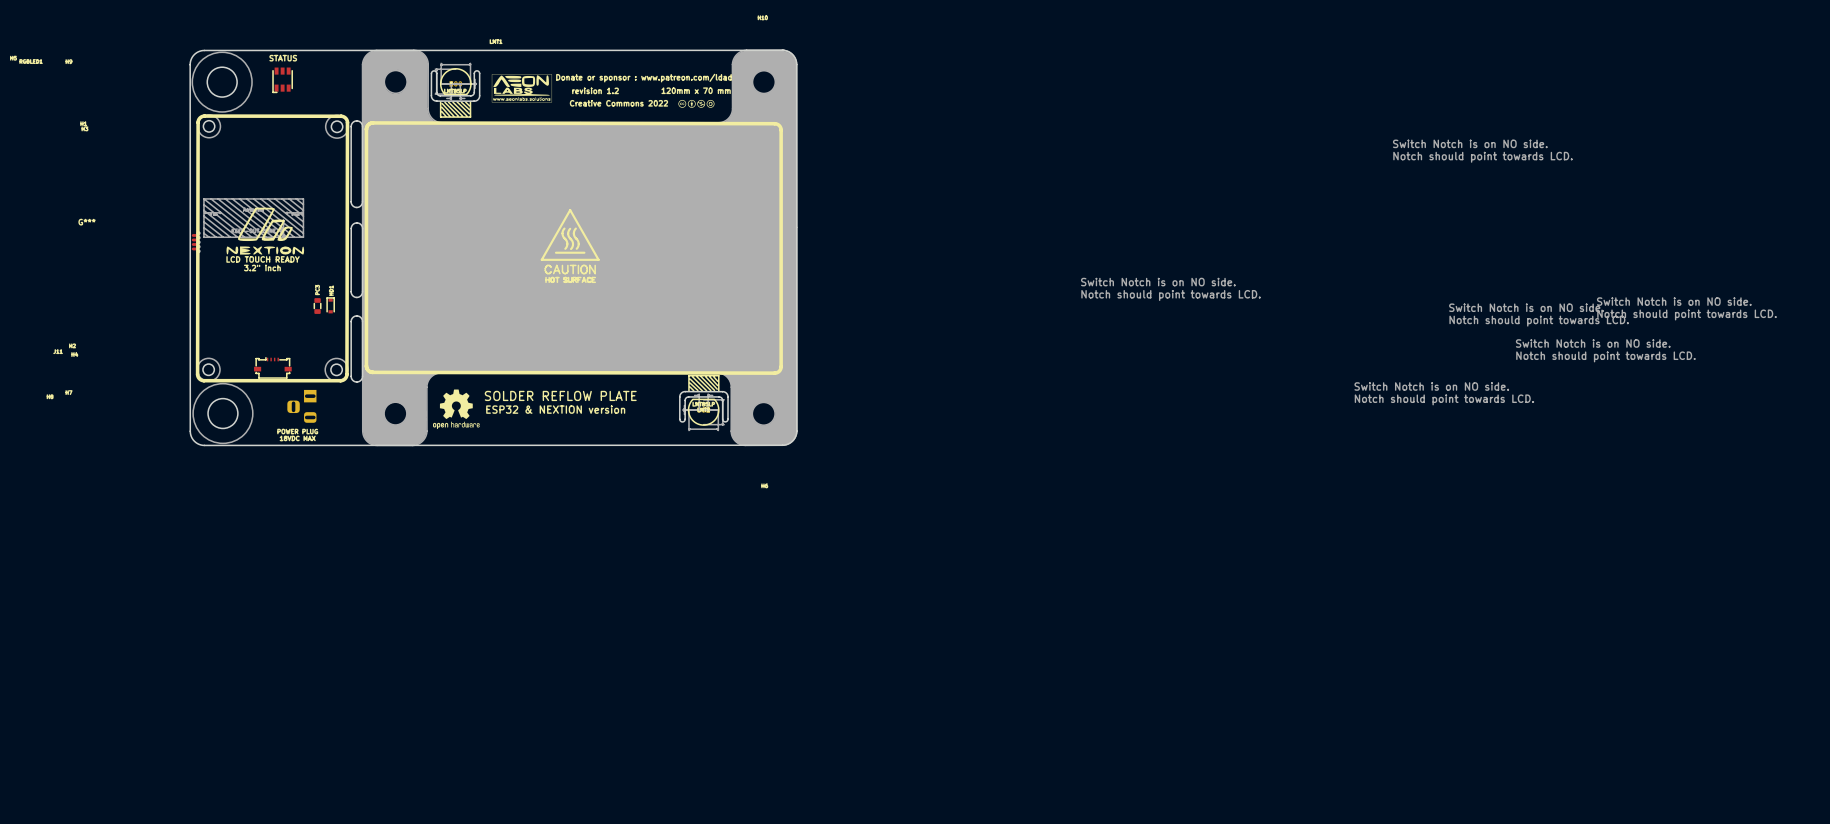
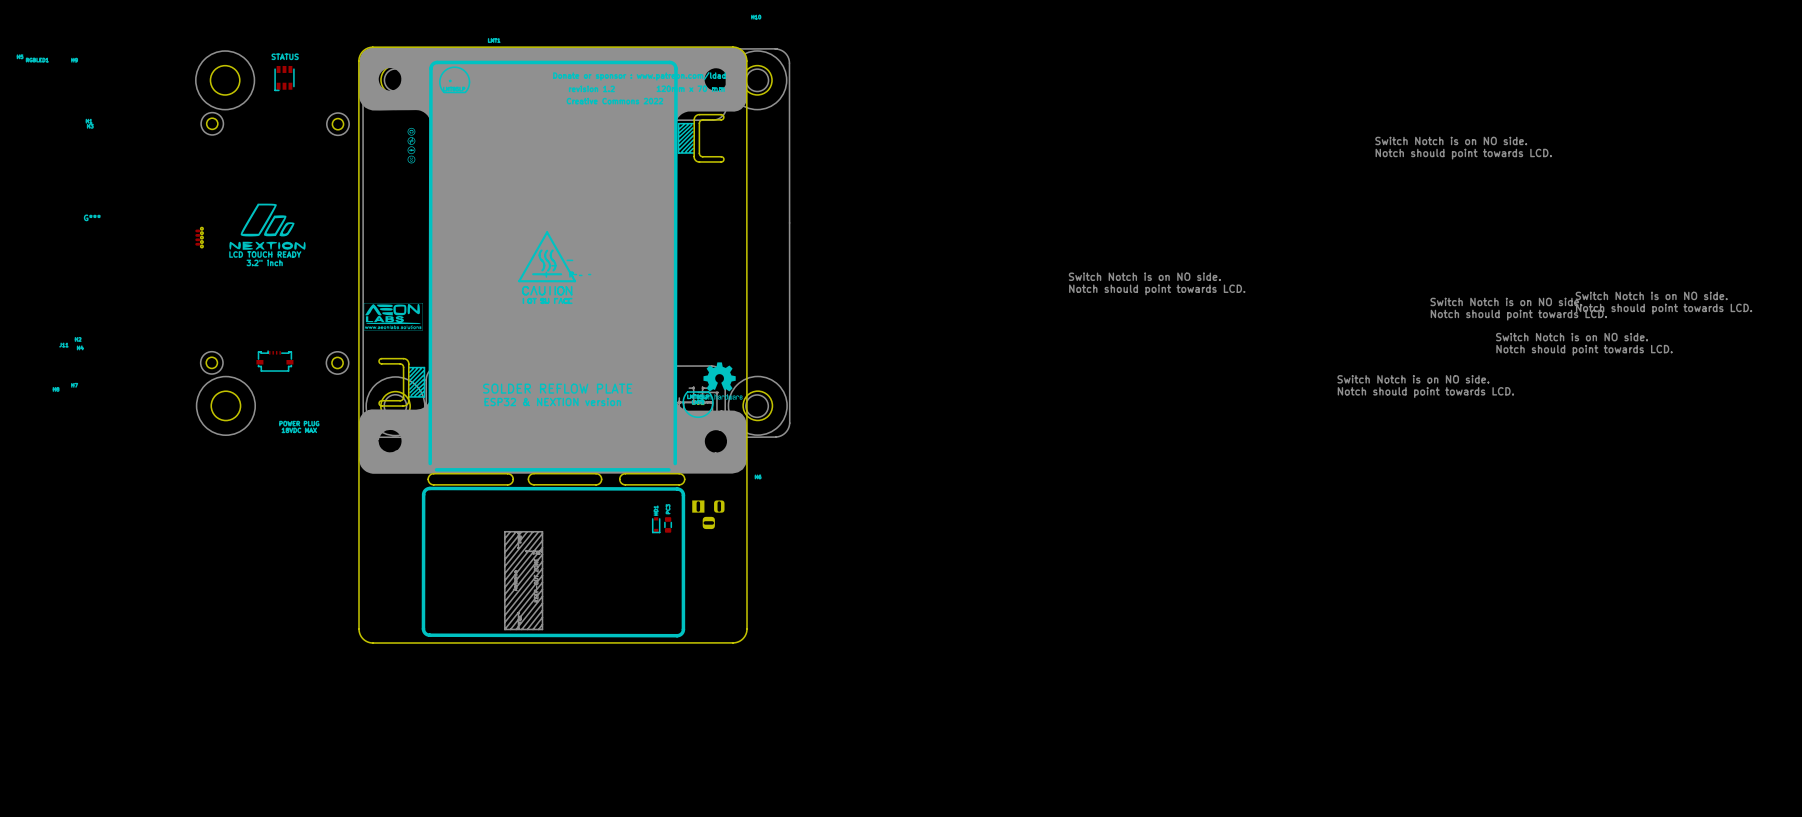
drawing: none -> [358, 47, 747, 474]
board edge: none -> (732, 47) (372, 47) (365, 49) (360, 54) (358, 61) (359, 629) (360, 635) (365, 640) (373, 643) (733, 642) (740, 641) (745, 635) (747, 628) (746, 61) (742, 51) (732, 47)
drawing: [362, 50, 797, 446] -> none
board edge: (782, 50) (204, 50) (196, 52) (191, 58) (190, 64) (190, 431) (192, 438) (197, 443) (204, 445) (782, 445) (789, 443) (794, 438) (796, 431) (796, 64) (792, 54) (782, 50) -> none
board edge: (479, 73) (479, 96) (477, 100) (436, 101) (432, 98) (432, 71) (436, 72) (436, 92) (440, 95) (472, 95) (474, 72) (477, 70) (479, 73) -> none
line: (457, 101) (469, 113) -> none
line: (470, 101) (470, 117) (440, 117) (440, 101) -> none
line: (444, 102) (458, 116) -> none
line: (448, 102) (462, 116) -> none
line: (452, 102) (467, 116) -> none
line: (461, 102) (469, 109) -> none
line: (465, 102) (469, 105) -> none
line: (442, 103) (453, 116) -> none
line: (441, 107) (449, 116) -> none
line: (441, 111) (445, 116) -> none
line: (204, 116) (341, 116) (345, 118) (347, 122) -> none
line: (204, 116) (199, 117) (198, 122) (197, 374) -> none
board edge: none -> (699, 114) (723, 116) (721, 119) (702, 119) (699, 123) (699, 155) (722, 156) (723, 159) (722, 161) (698, 161) (694, 158) (694, 119) (699, 114)
board edge: (356, 120) (351, 125) (351, 201) (352, 205) (356, 207) (362, 202) (362, 126) (360, 122) (356, 120) -> none
line: (347, 122) (346, 377) (340, 380) (203, 380) (199, 378) (197, 374) -> none
line: (372, 122) (774, 123) (779, 125) (781, 130) (781, 366) (777, 372) (372, 372) -> none
line: none -> (693, 123) (678, 123) (678, 153) (693, 152)
line: none -> (683, 124) (679, 128)
line: none -> (688, 124) (679, 132)
line: none -> (691, 125) (679, 136)
line: (366, 129) (366, 365) -> none
line: none -> (692, 127) (679, 141)
line: none -> (693, 131) (679, 145)
line: none -> (693, 135) (679, 149)
line: none -> (693, 139) (681, 151)
line: none -> (692, 144) (685, 151)
line: none -> (693, 148) (689, 152)
line: (570, 210) (598, 259) (541, 259) (570, 210) -> (547, 232) (575, 281) (519, 281) (547, 232)
part: (253, 218) -> none
board edge: (356, 222) (351, 227) (351, 291) (352, 295) (356, 297) (362, 292) (362, 228) (360, 224) (356, 222) -> none
line: (564, 228) (562, 233) (567, 242) (565, 248) -> (541, 250) (539, 255) (544, 264) (542, 270)
line: (570, 228) (568, 233) (572, 242) (571, 249) -> (547, 250) (545, 255) (549, 264) (547, 270)
line: (575, 228) (574, 234) (578, 243) (576, 248) -> (552, 250) (550, 256) (555, 265) (553, 270)
line: (555, 252) (584, 252) -> (533, 274) (561, 274)
line: (562, 265) (562, 271) (564, 273) (567, 272) (567, 265) -> (539, 286) (539, 292) (541, 294) (544, 293) (544, 286)
line: (573, 265) (573, 273) -> (550, 286) (550, 294)
line: (578, 265) (578, 273) -> (555, 286) (555, 294)
line: (583, 265) (580, 270) (584, 273) (587, 268) (583, 265) -> (560, 286) (557, 291) (561, 294) (563, 289) (560, 286)
line: (595, 265) (595, 273) (589, 265) (589, 273) -> (571, 286) (571, 294) (566, 286) (566, 294)
line: (551, 267) (547, 265) (545, 268) (546, 273) (551, 271) -> (528, 288) (524, 286) (522, 289) (524, 294) (528, 292)
line: (553, 273) (556, 265) (559, 273) -> (530, 294) (533, 286) (537, 294)
line: (546, 277) (546, 282) -> (523, 298) (523, 303)
line: (552, 277) (554, 279) (552, 282) (550, 280) (552, 277) -> (529, 298) (531, 300) (530, 303) (527, 301) (529, 298)
line: (555, 277) (558, 277) -> (532, 298) (536, 298)
line: (557, 277) (557, 282) -> (534, 298) (534, 303)
line: (568, 277) (569, 282) (571, 277) -> (545, 298) (546, 303) (548, 298)
line: (580, 277) (577, 277) (577, 282) -> (557, 298) (554, 298) (554, 303)
line: (595, 277) (592, 277) (592, 282) (595, 282) -> (571, 298) (568, 298) (568, 303) (571, 303)
line: (567, 278) (563, 278) (567, 280) (563, 281) -> (544, 299) (540, 299) (544, 301) (540, 302)
line: (590, 278) (588, 277) (587, 279) (588, 282) (590, 281) -> (567, 299) (564, 300) (564, 303) (567, 302)
line: (582, 282) (584, 277) (585, 282) -> (559, 303) (560, 298) (562, 303)
part rotation: 0° (330, 305) -> 180° (656, 525)
part position: (330, 305) -> (656, 525)
part position: (317, 306) -> (668, 524)
board edge: (356, 315) (352, 317) (351, 321) (351, 376) (356, 382) (360, 380) (362, 376) (362, 320) (356, 315) -> none
board edge: none -> (381, 358) (404, 358) (408, 361) (408, 401) (406, 405) (379, 404) (381, 400) (400, 400) (403, 397) (403, 365) (380, 363) (379, 360) (381, 358)
line: none -> (409, 367) (424, 367) (424, 396) (409, 396)
line: none -> (413, 368) (409, 372)
line: none -> (417, 368) (409, 376)
line: none -> (421, 368) (409, 380)
line: (692, 376) (706, 390) -> none
line: (696, 376) (710, 390) -> none
line: (701, 376) (714, 390) -> none
line: (705, 376) (717, 389) -> none
line: (709, 376) (717, 385) -> none
line: (713, 376) (717, 381) -> none
line: none -> (423, 371) (409, 384)
line: (690, 379) (702, 390) -> none
line: none -> (423, 375) (409, 389)
line: (690, 383) (697, 390) -> none
line: none -> (423, 379) (409, 392)
line: (689, 386) (693, 390) -> none
line: none -> (423, 384) (411, 395)
board edge: (685, 391) (725, 392) (728, 396) (727, 420) (725, 421) (722, 419) (722, 400) (720, 397) (688, 396) (685, 399) (684, 420) (680, 421) (679, 396) (685, 391) -> none
line: (718, 391) (718, 375) (688, 375) (688, 391) -> none
line: none -> (423, 387) (414, 395)
line: none -> (423, 391) (418, 395)
part: (301, 406) -> none
line: none -> (430, 463) (430, 68) (432, 64) (437, 62) (669, 62) (675, 65) (675, 463)
line: none -> (436, 469) (668, 469)
board edge: none -> (433, 473) (508, 473) (512, 475) (513, 480) (507, 484) (433, 484) (429, 482) (428, 478) (433, 473)
board edge: none -> (534, 473) (596, 473) (600, 475) (601, 480) (596, 484) (533, 484) (529, 482) (528, 478) (534, 473)
board edge: none -> (625, 473) (679, 473) (683, 475) (684, 479) (679, 484) (624, 484) (621, 482) (619, 478) (625, 473)
line: none -> (429, 488) (680, 489) (683, 495) (683, 629) (681, 633) (677, 635)
line: none -> (429, 488) (425, 490) (423, 494) (423, 628)
part: none -> (708, 514)
part: none -> (523, 580)
line: none -> (423, 628) (425, 633) (429, 635) (677, 635)

